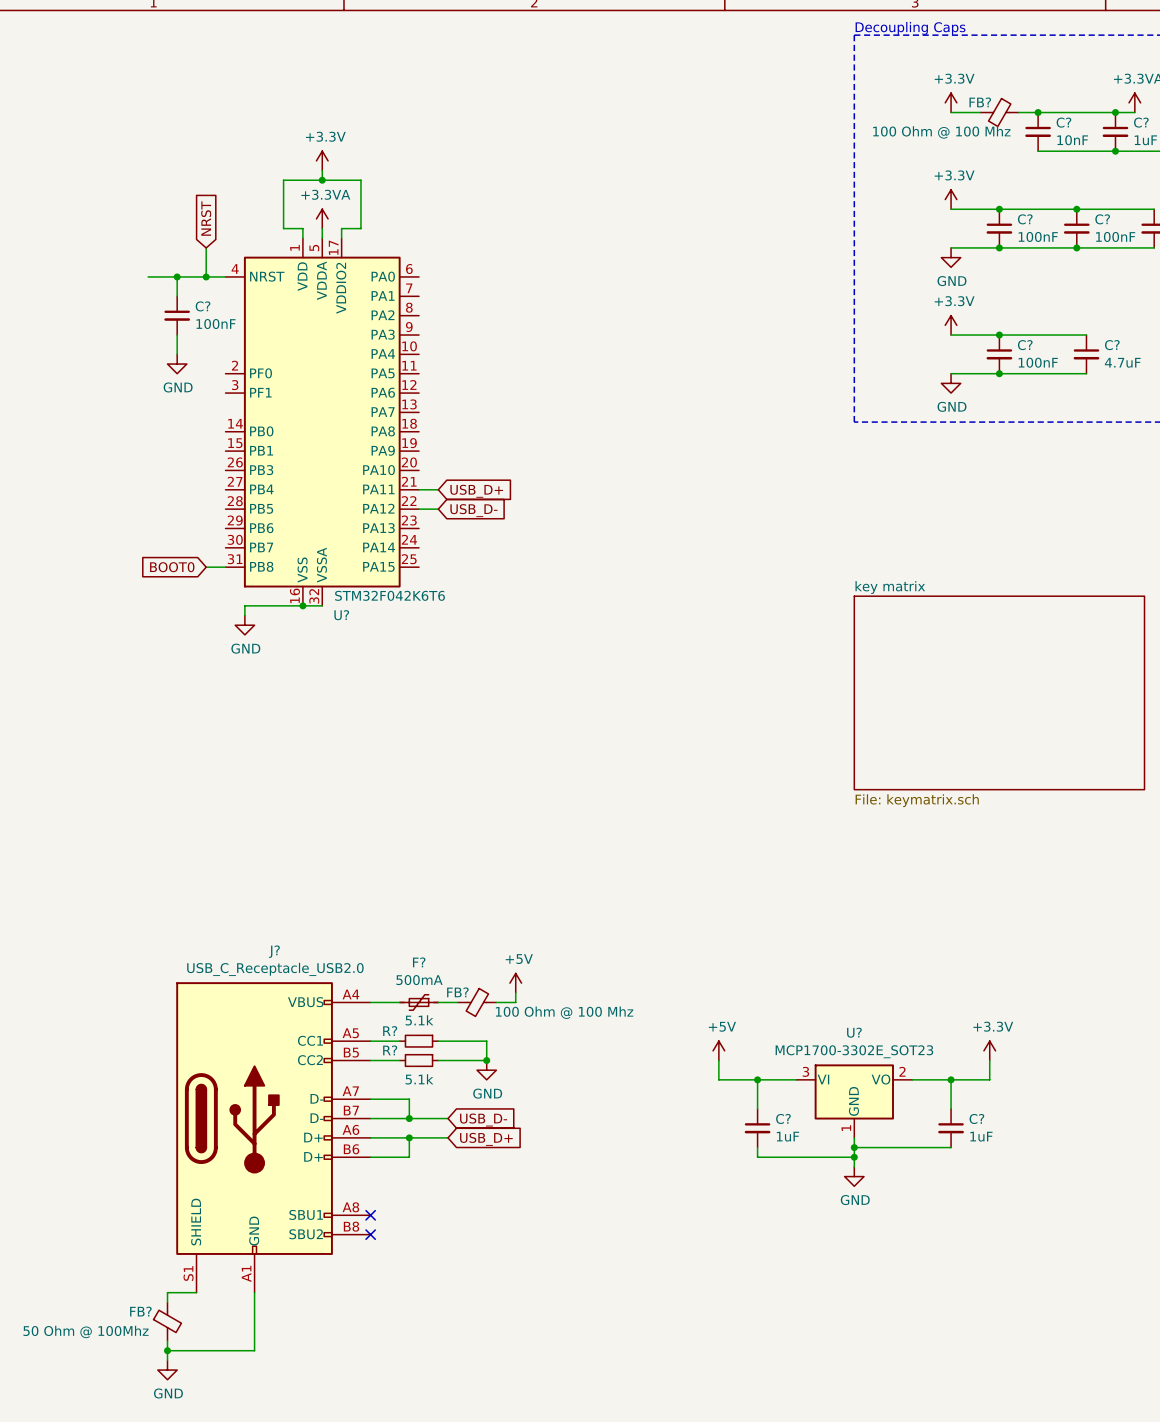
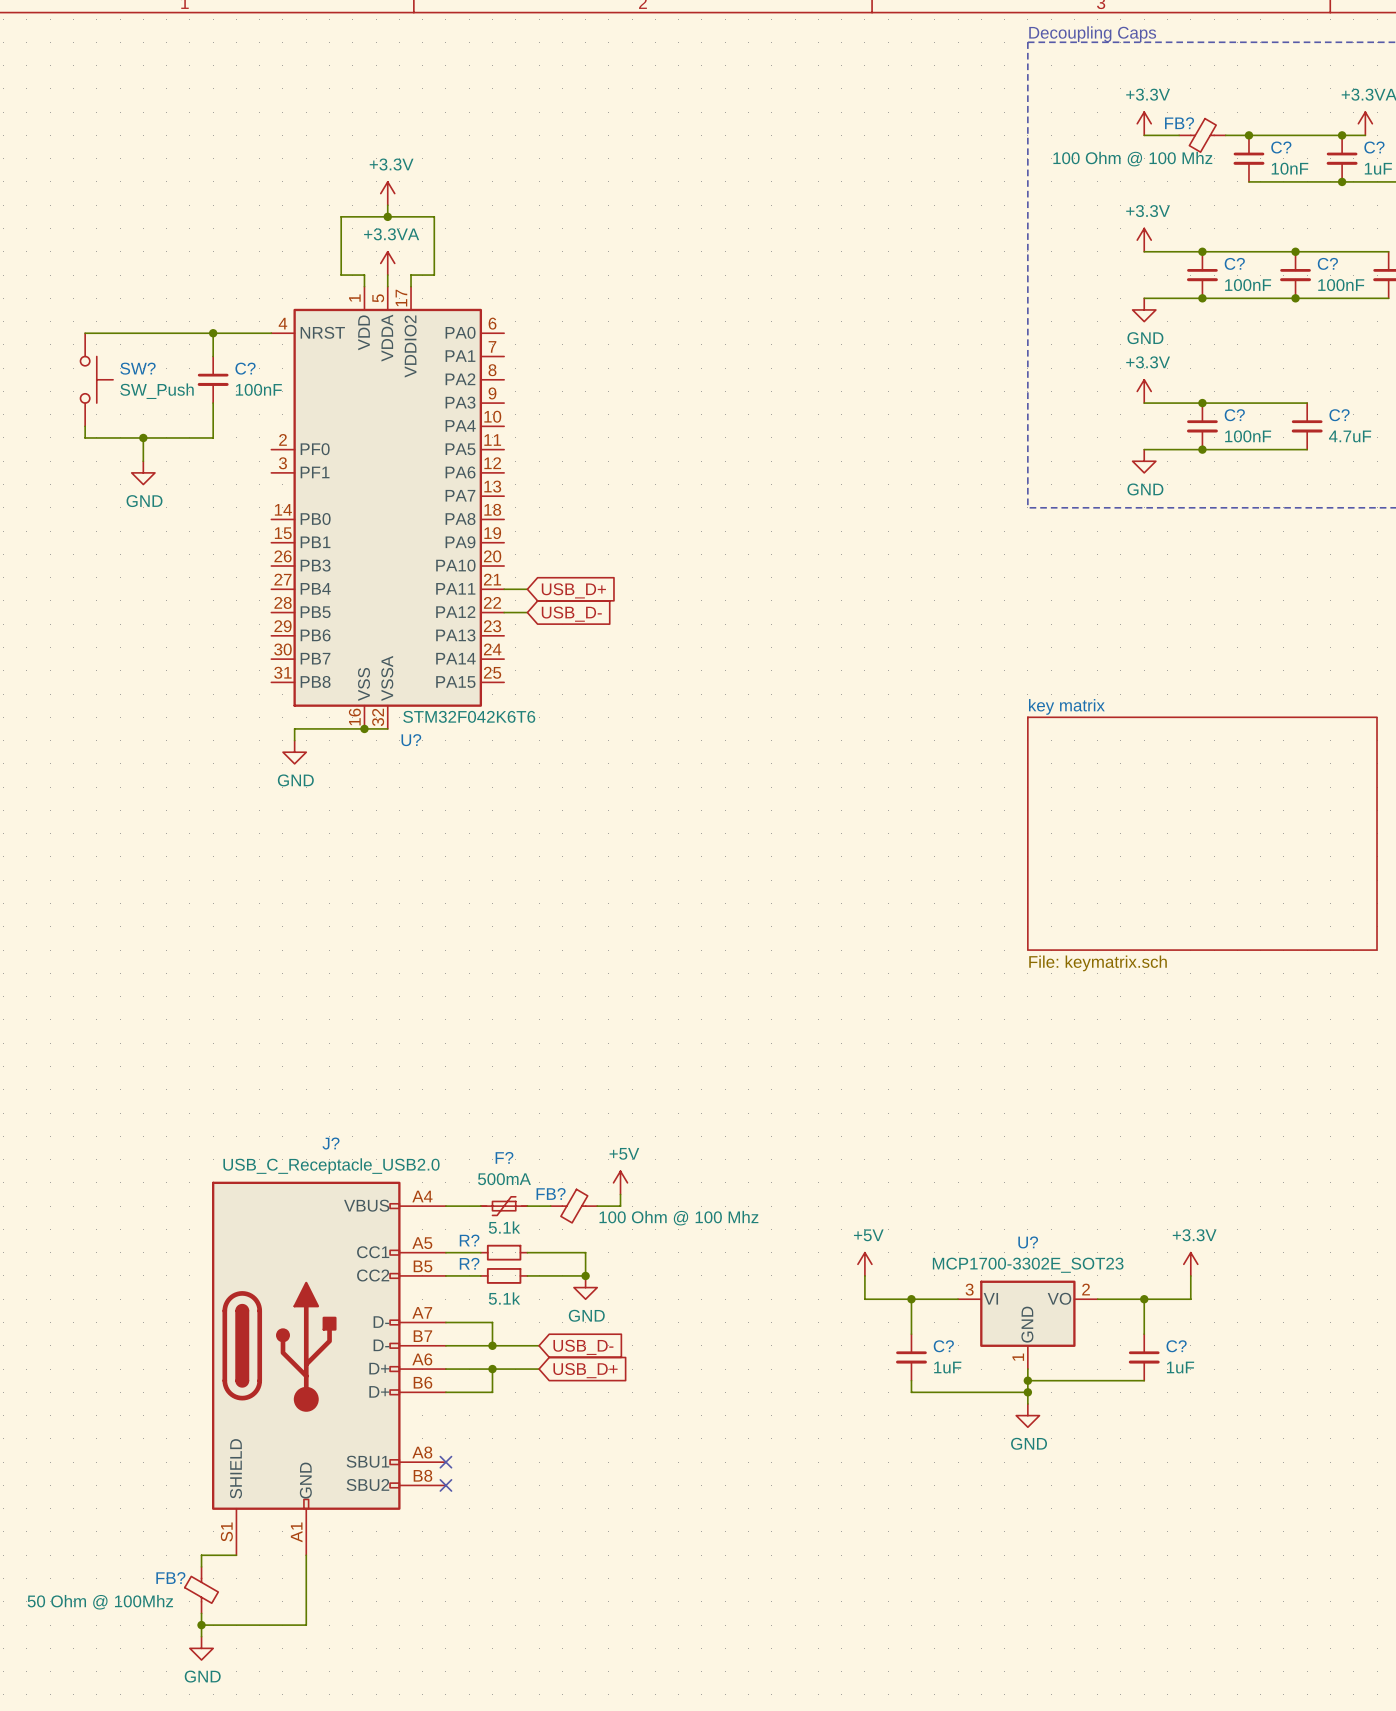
global label: NRST (206, 218) -> none
wire: (206, 247) (206, 276) -> none
wire: none -> (85, 333) (178, 333)
junction: (206, 276) -> none
SW?: none -> SW_Push (96, 379)
wire: none -> (85, 426) (85, 437) (213, 437) (213, 426)
wire: none -> (143, 437) (143, 461)
junction: none -> (143, 437)
power symbol position: GND (177, 364) -> GND (143, 472)
global label: BOOT0 (172, 567) -> none
wire: (206, 567) (225, 567) -> none

